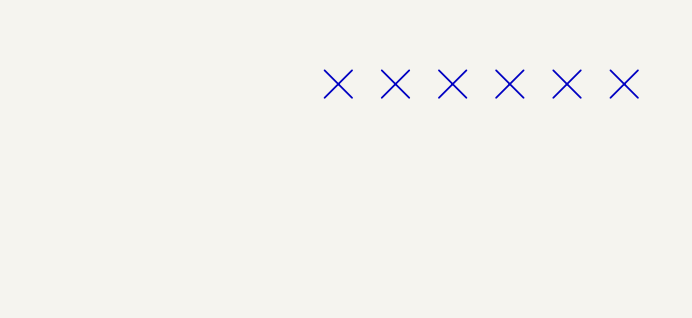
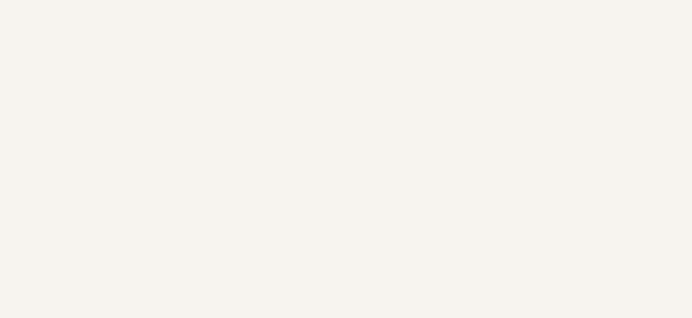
no-connect mark: (338, 84) -> none
no-connect mark: (395, 84) -> none
no-connect mark: (452, 84) -> none
no-connect mark: (509, 84) -> none
no-connect mark: (567, 84) -> none
no-connect mark: (624, 84) -> none

